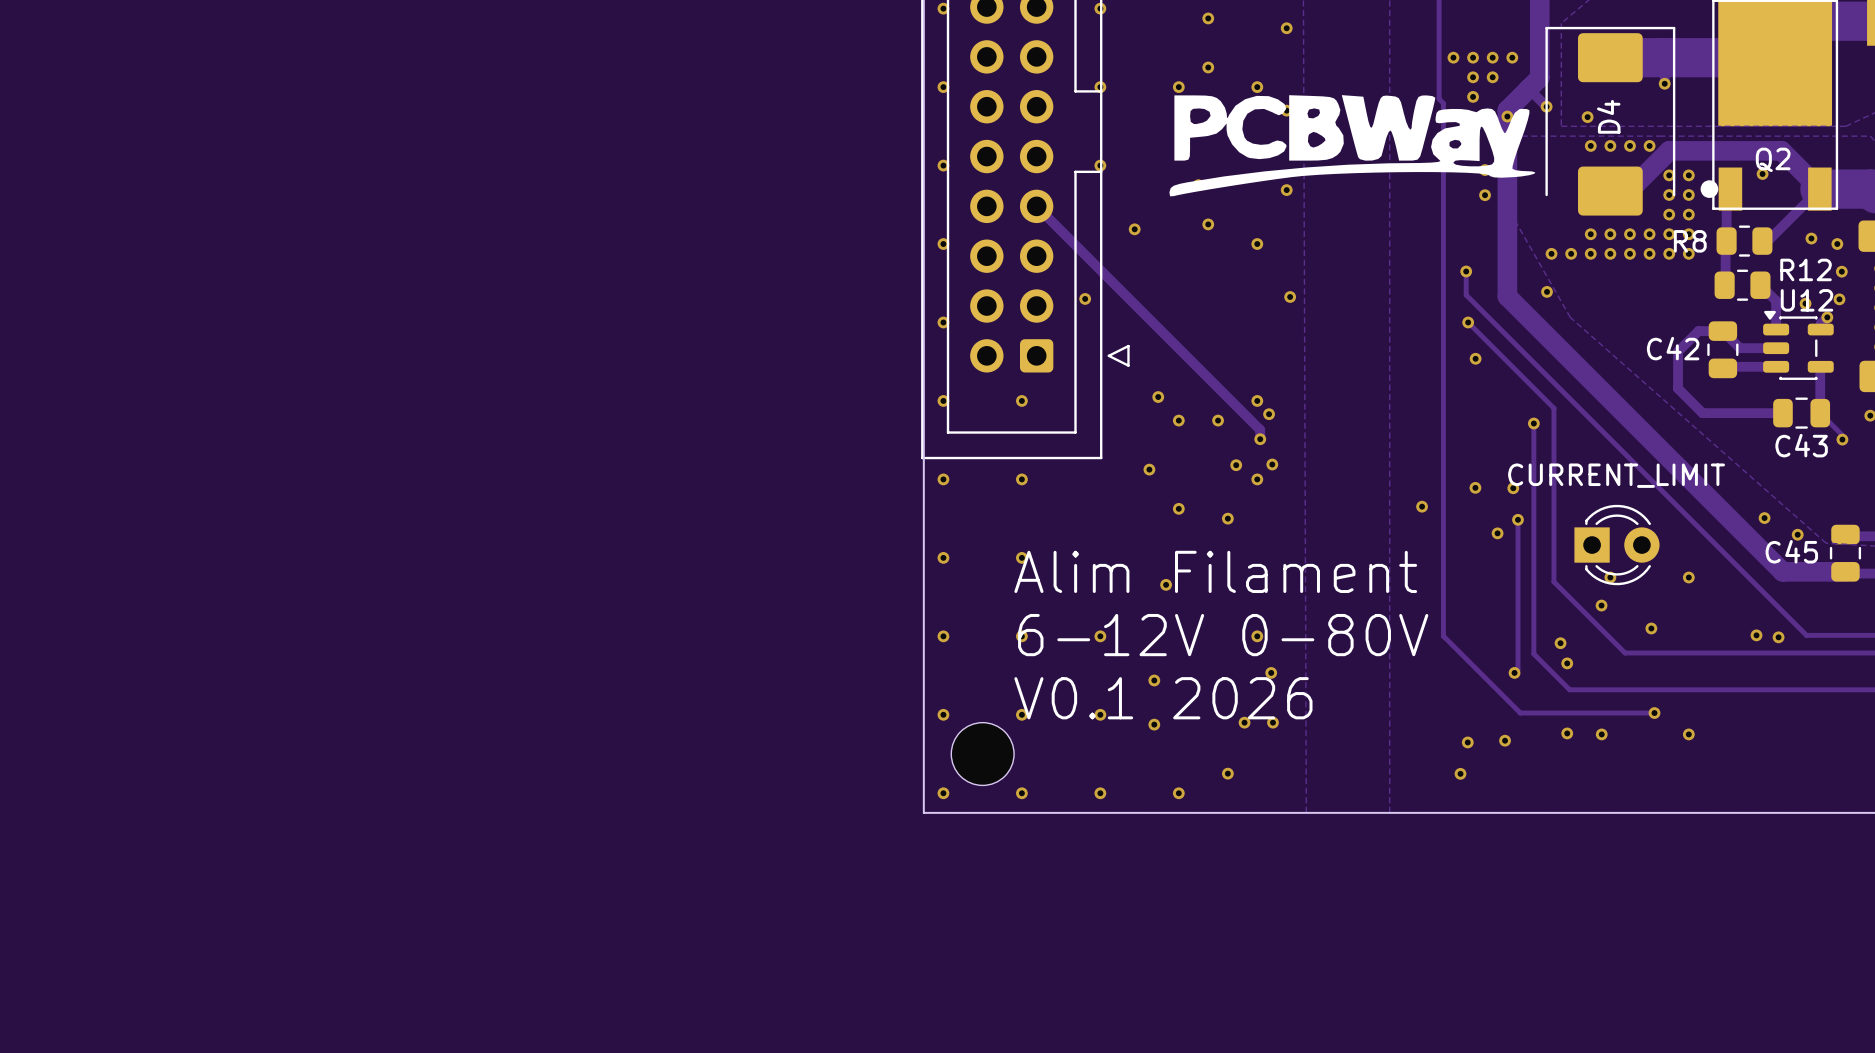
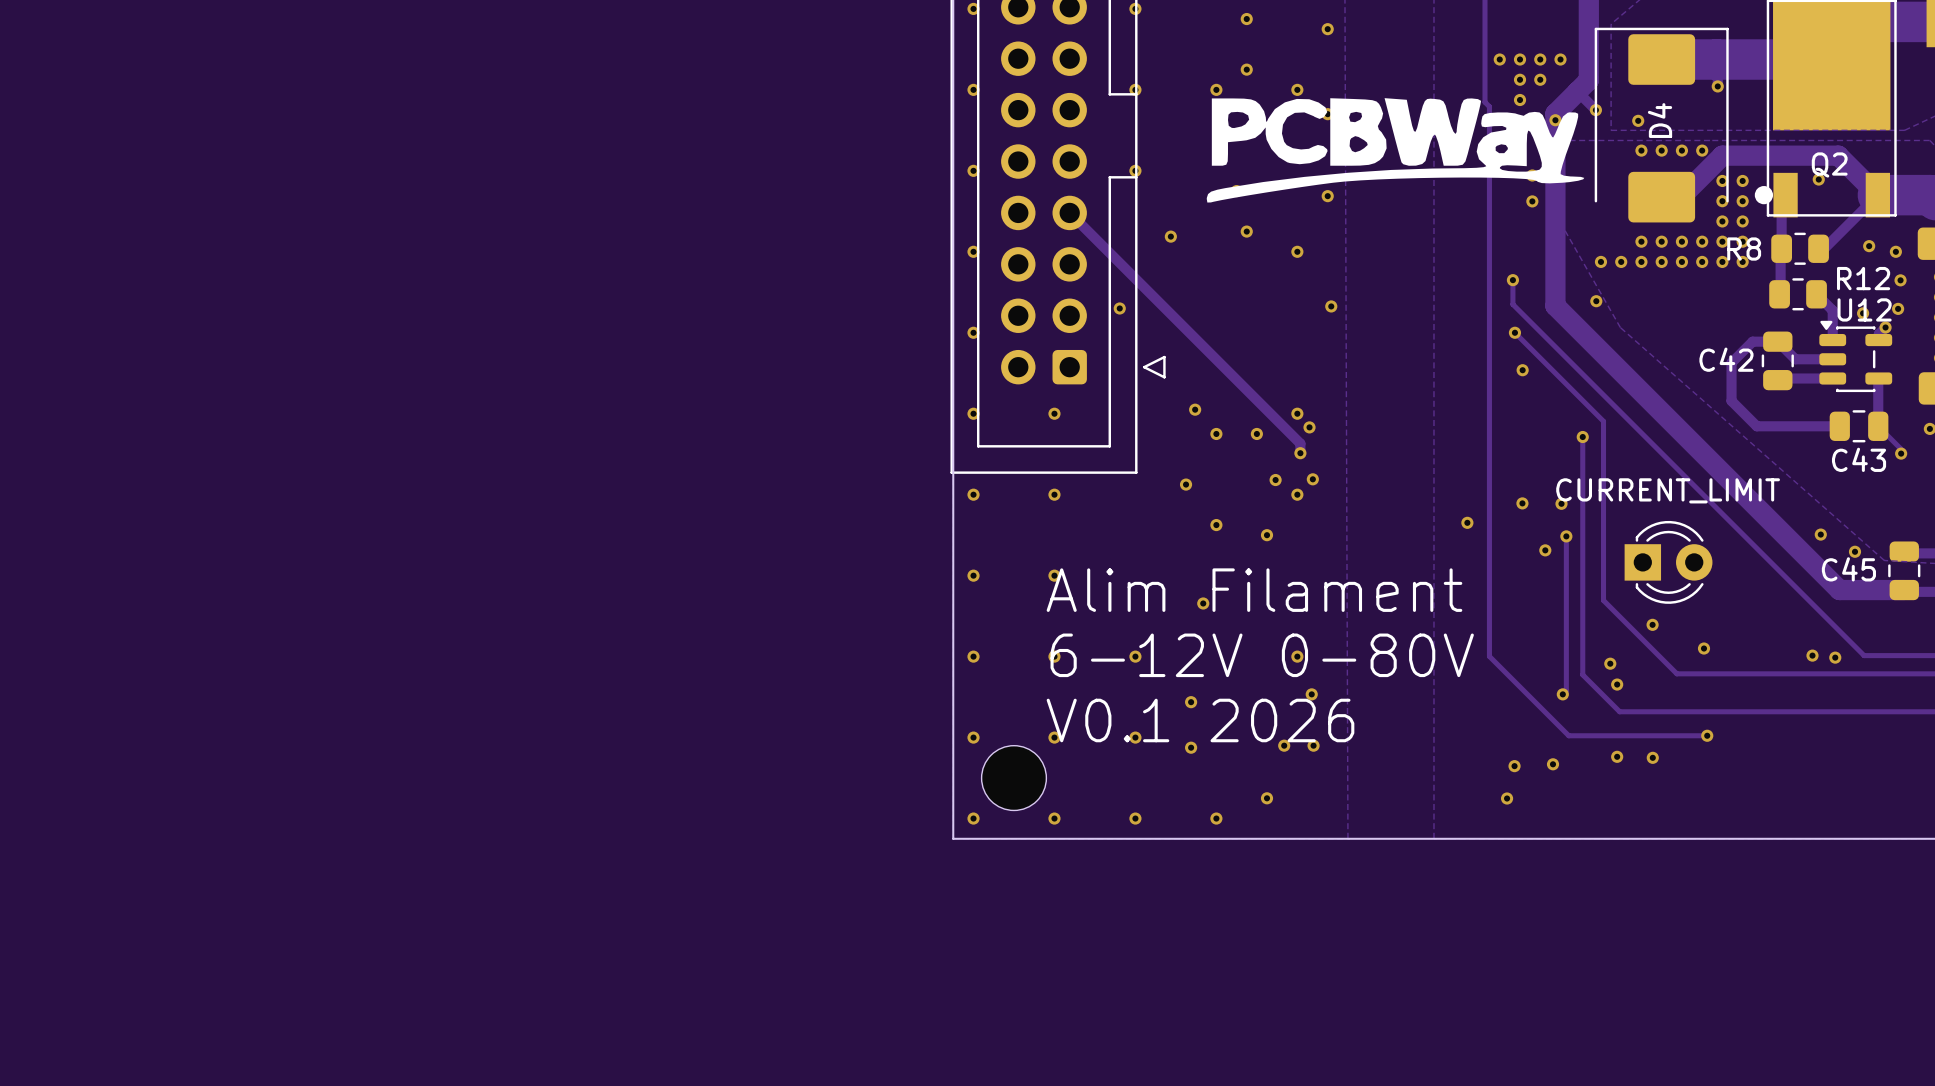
via: (1610, 577) -> none
via: (1688, 577) -> none
via: (1688, 734) -> none

